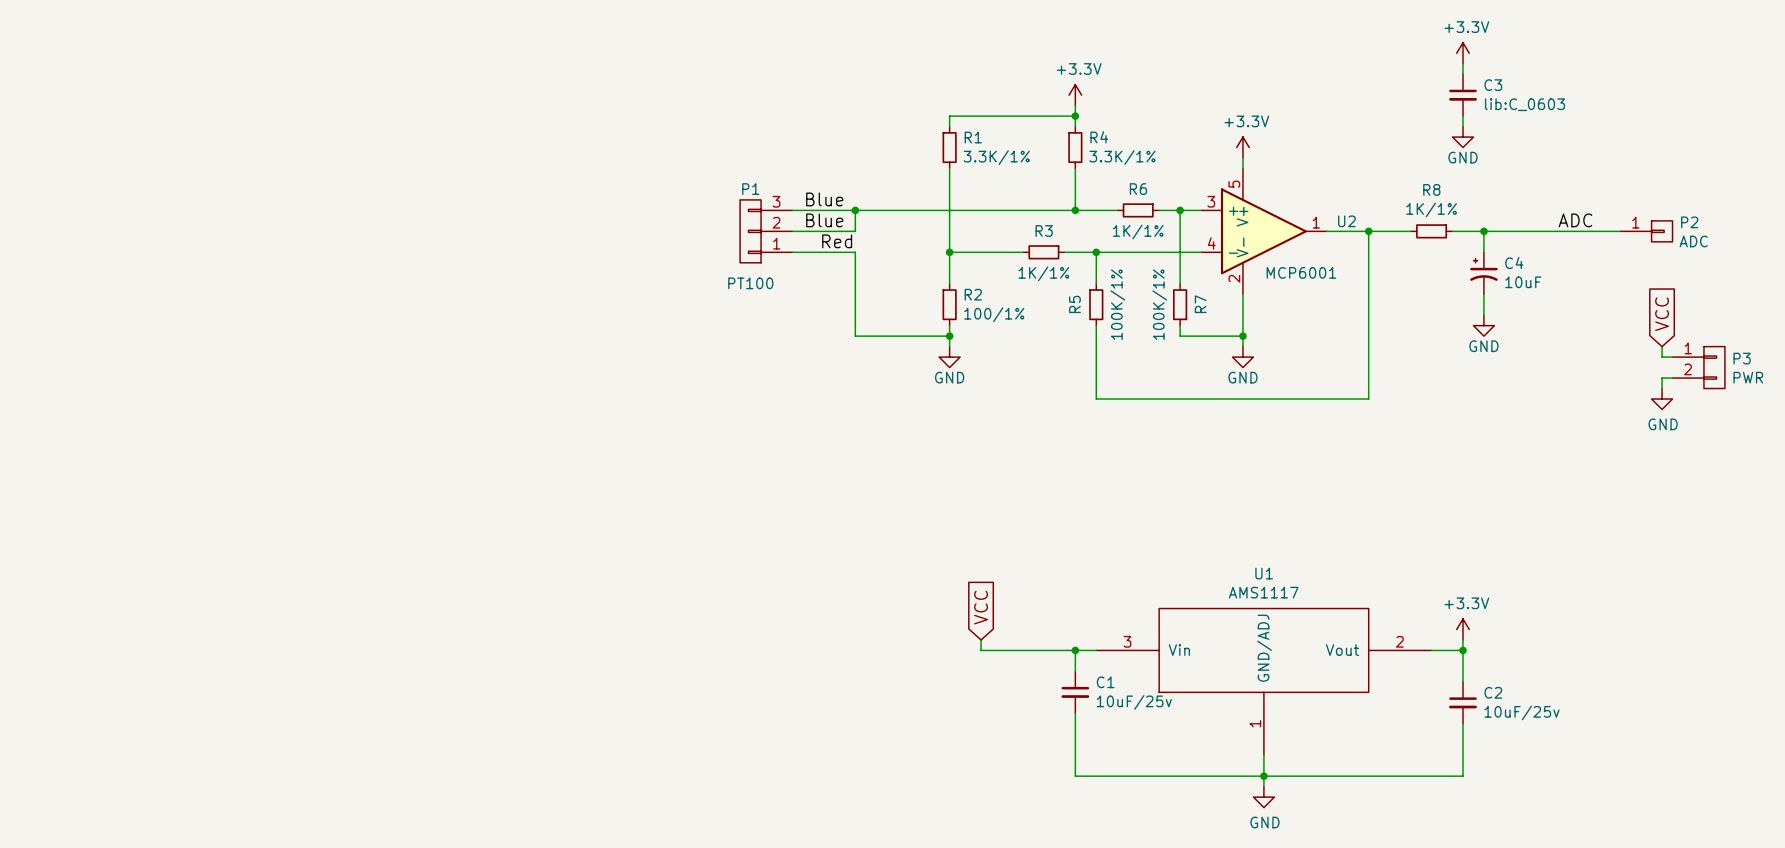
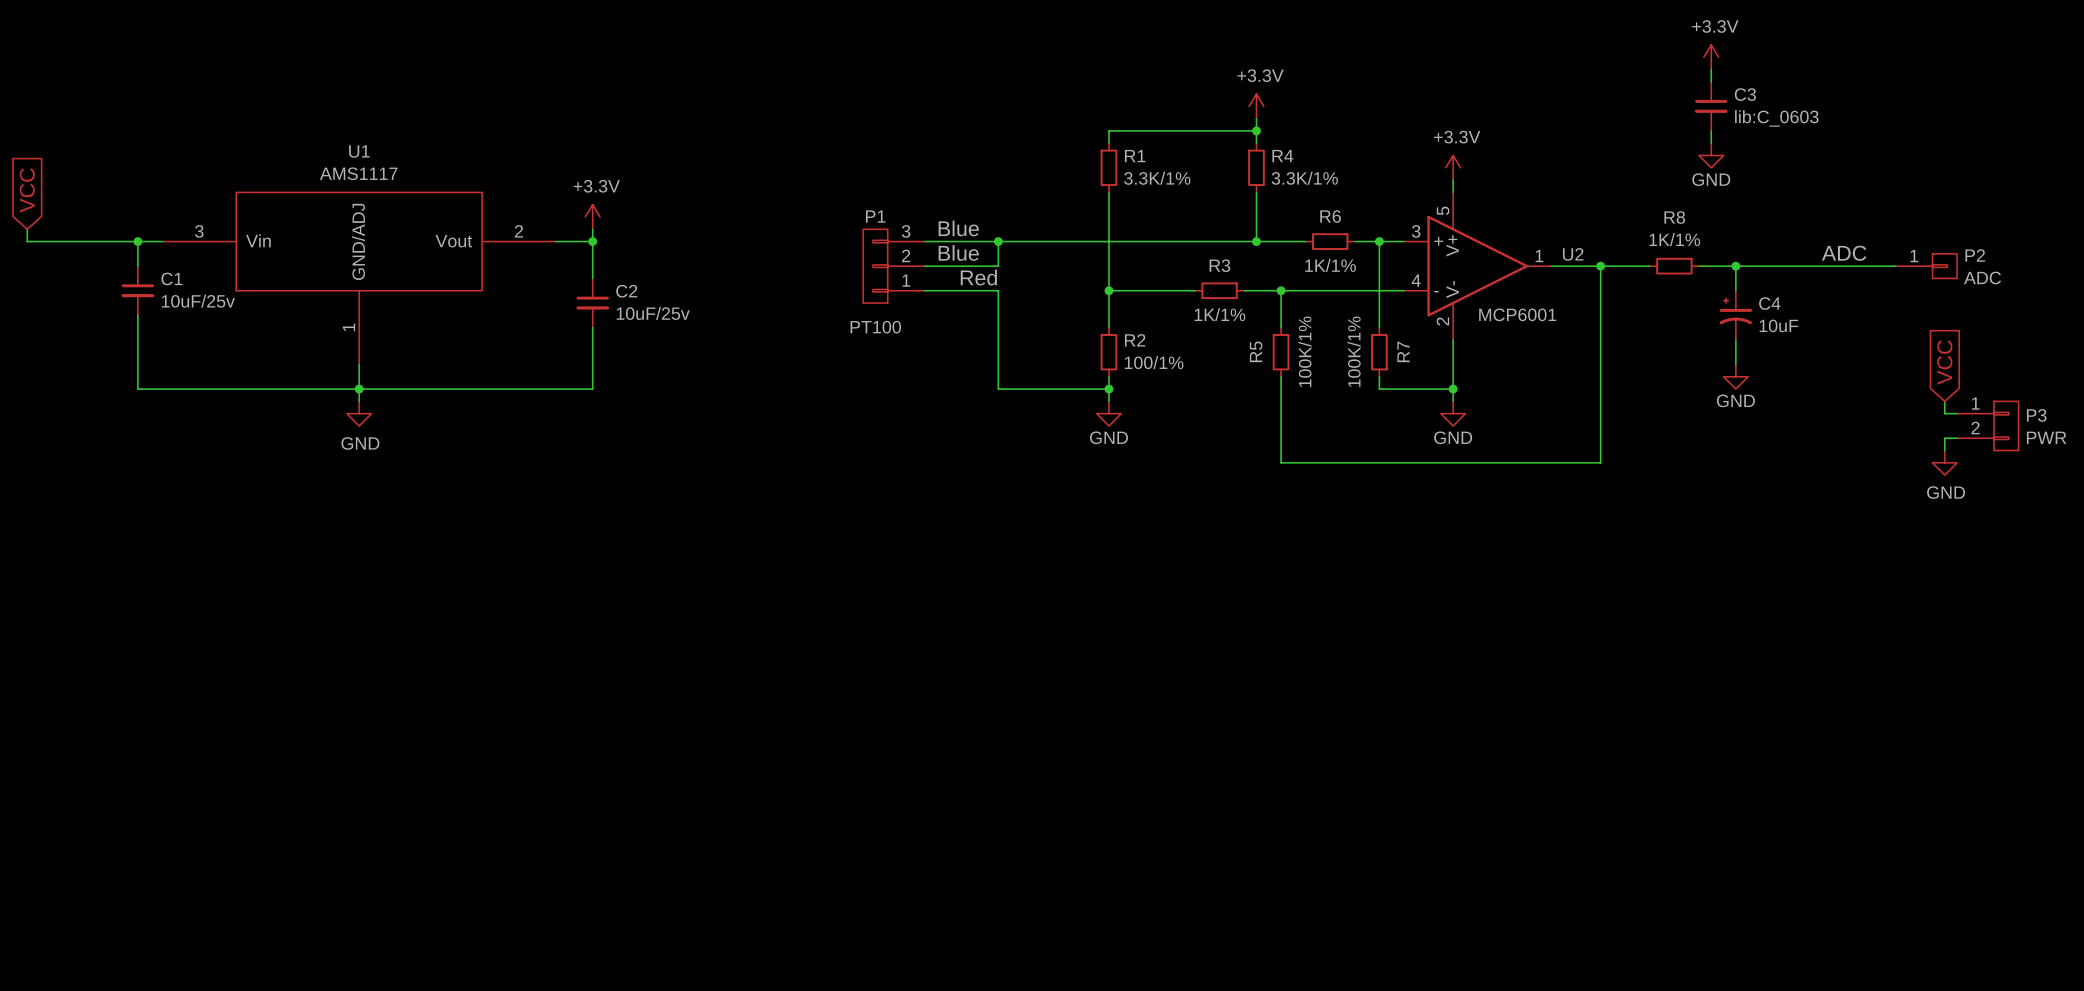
global label: none -> VCC (27, 190)
power symbol: none -> +3.3V (592, 216)
wire: none -> (27, 229) (27, 241) (162, 241)
wire: none -> (592, 229) (592, 278)
wire: none -> (137, 241) (137, 266)
junction: none -> (137, 241)
wire: none -> (555, 241) (592, 241)
junction: none -> (592, 241)
wire: none -> (137, 315) (137, 389) (592, 389) (592, 327)
wire: none -> (359, 364) (359, 401)
junction: none -> (359, 389)
power symbol: none -> GND (359, 413)
global label: VCC (981, 607) -> none
power symbol: +3.3V (1462, 629) -> none
wire: (981, 639) (981, 650) (1096, 650) -> none
wire: (1462, 639) (1462, 681) -> none
wire: (1075, 650) (1075, 671) -> none
junction: (1075, 650) -> none
wire: (1431, 650) (1462, 650) -> none
junction: (1462, 650) -> none
U1 position: (1263, 681) -> (359, 278)
C1 position: (1075, 692) -> (137, 290)
C2 position: (1462, 702) -> (592, 303)
wire: (1075, 713) (1075, 776) (1462, 776) (1462, 723) -> none
wire: (1263, 755) (1263, 786) -> none
junction: (1263, 776) -> none
power symbol: GND (1263, 797) -> none

